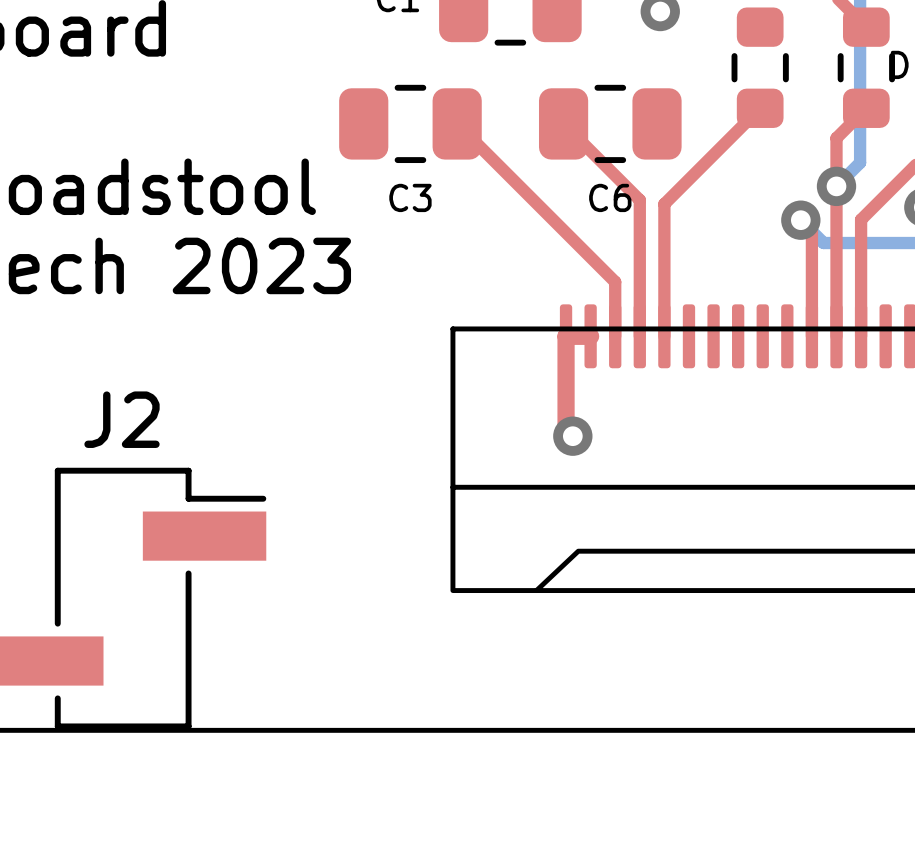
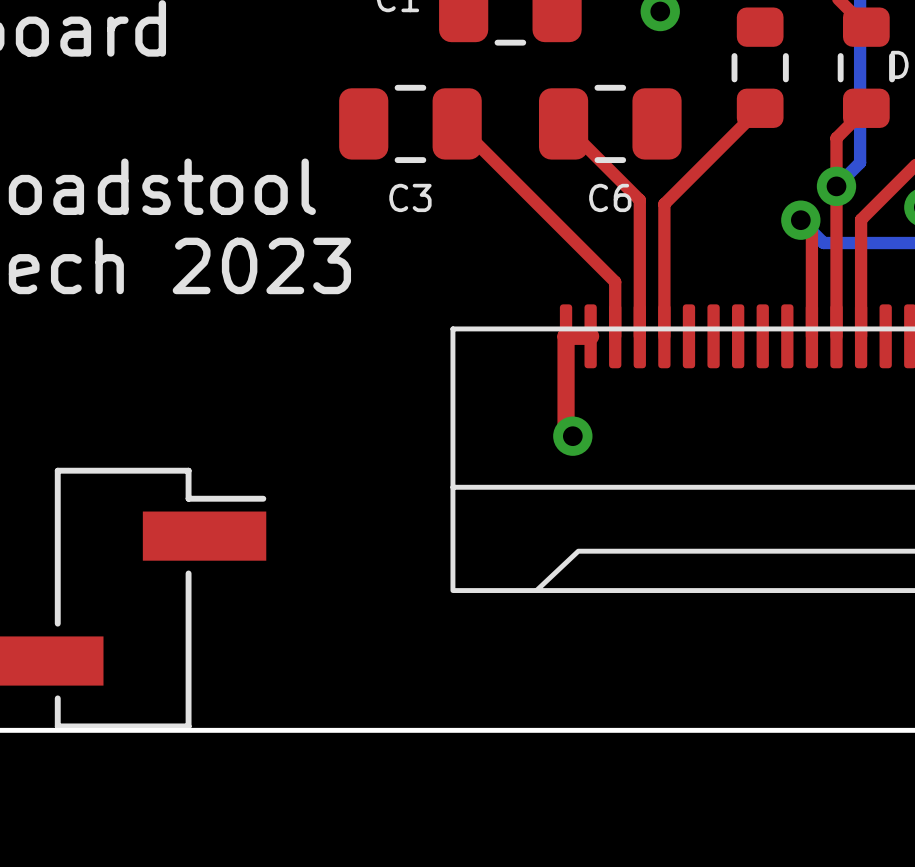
J2 name: J2 (122, 419) -> none

